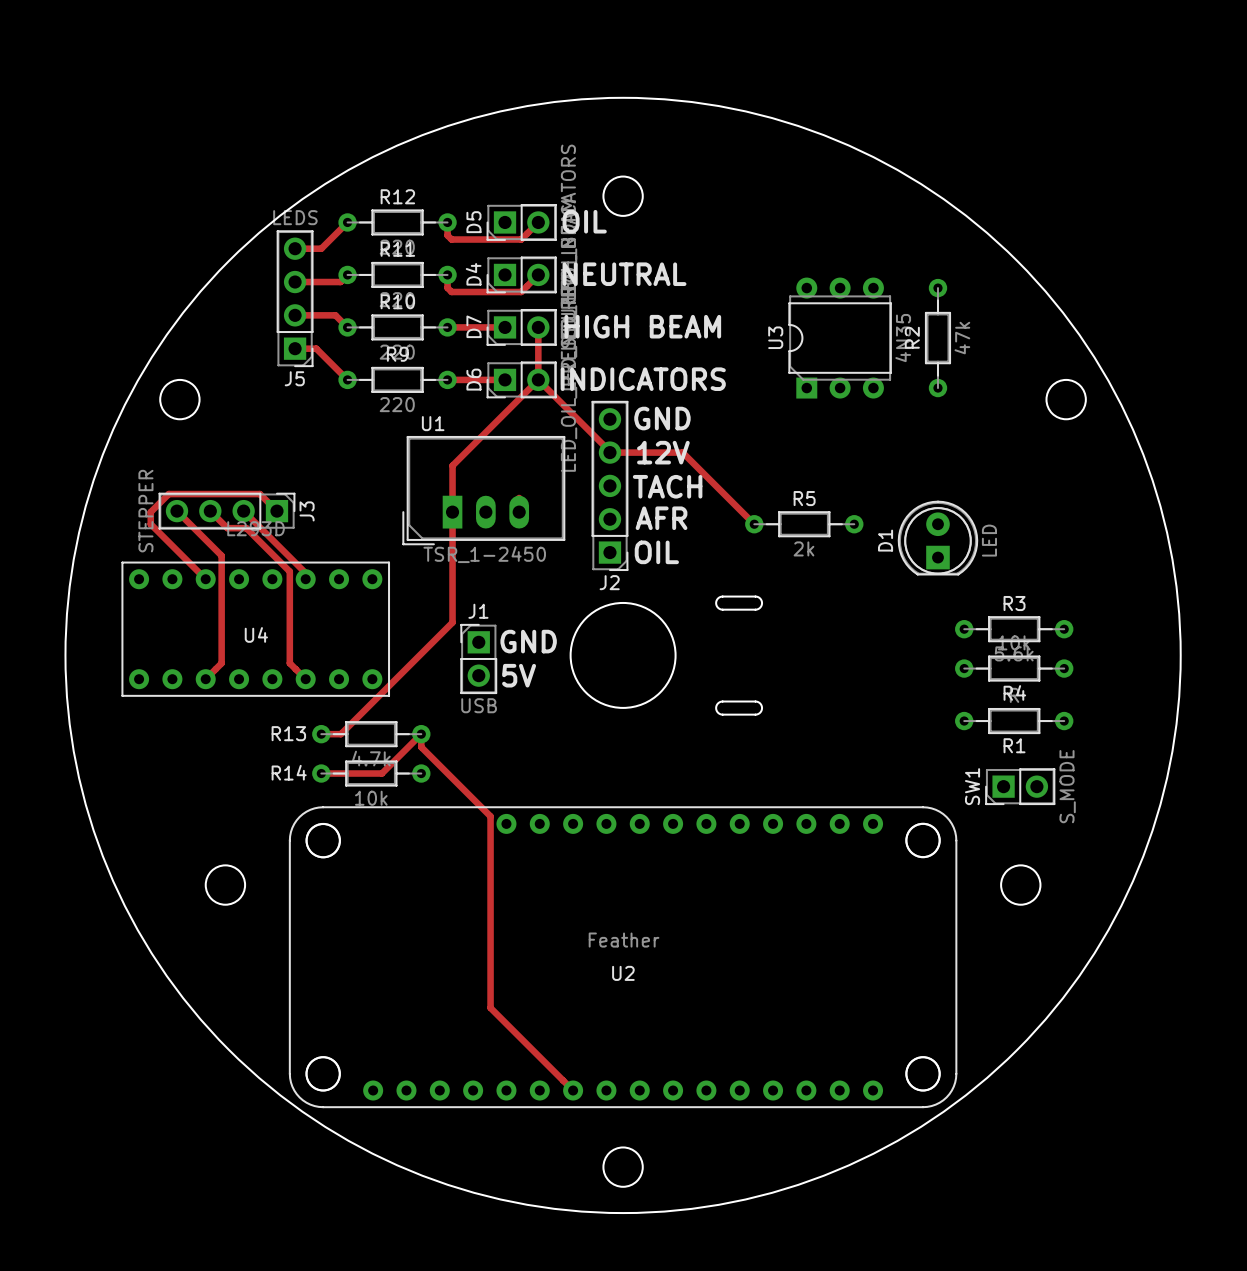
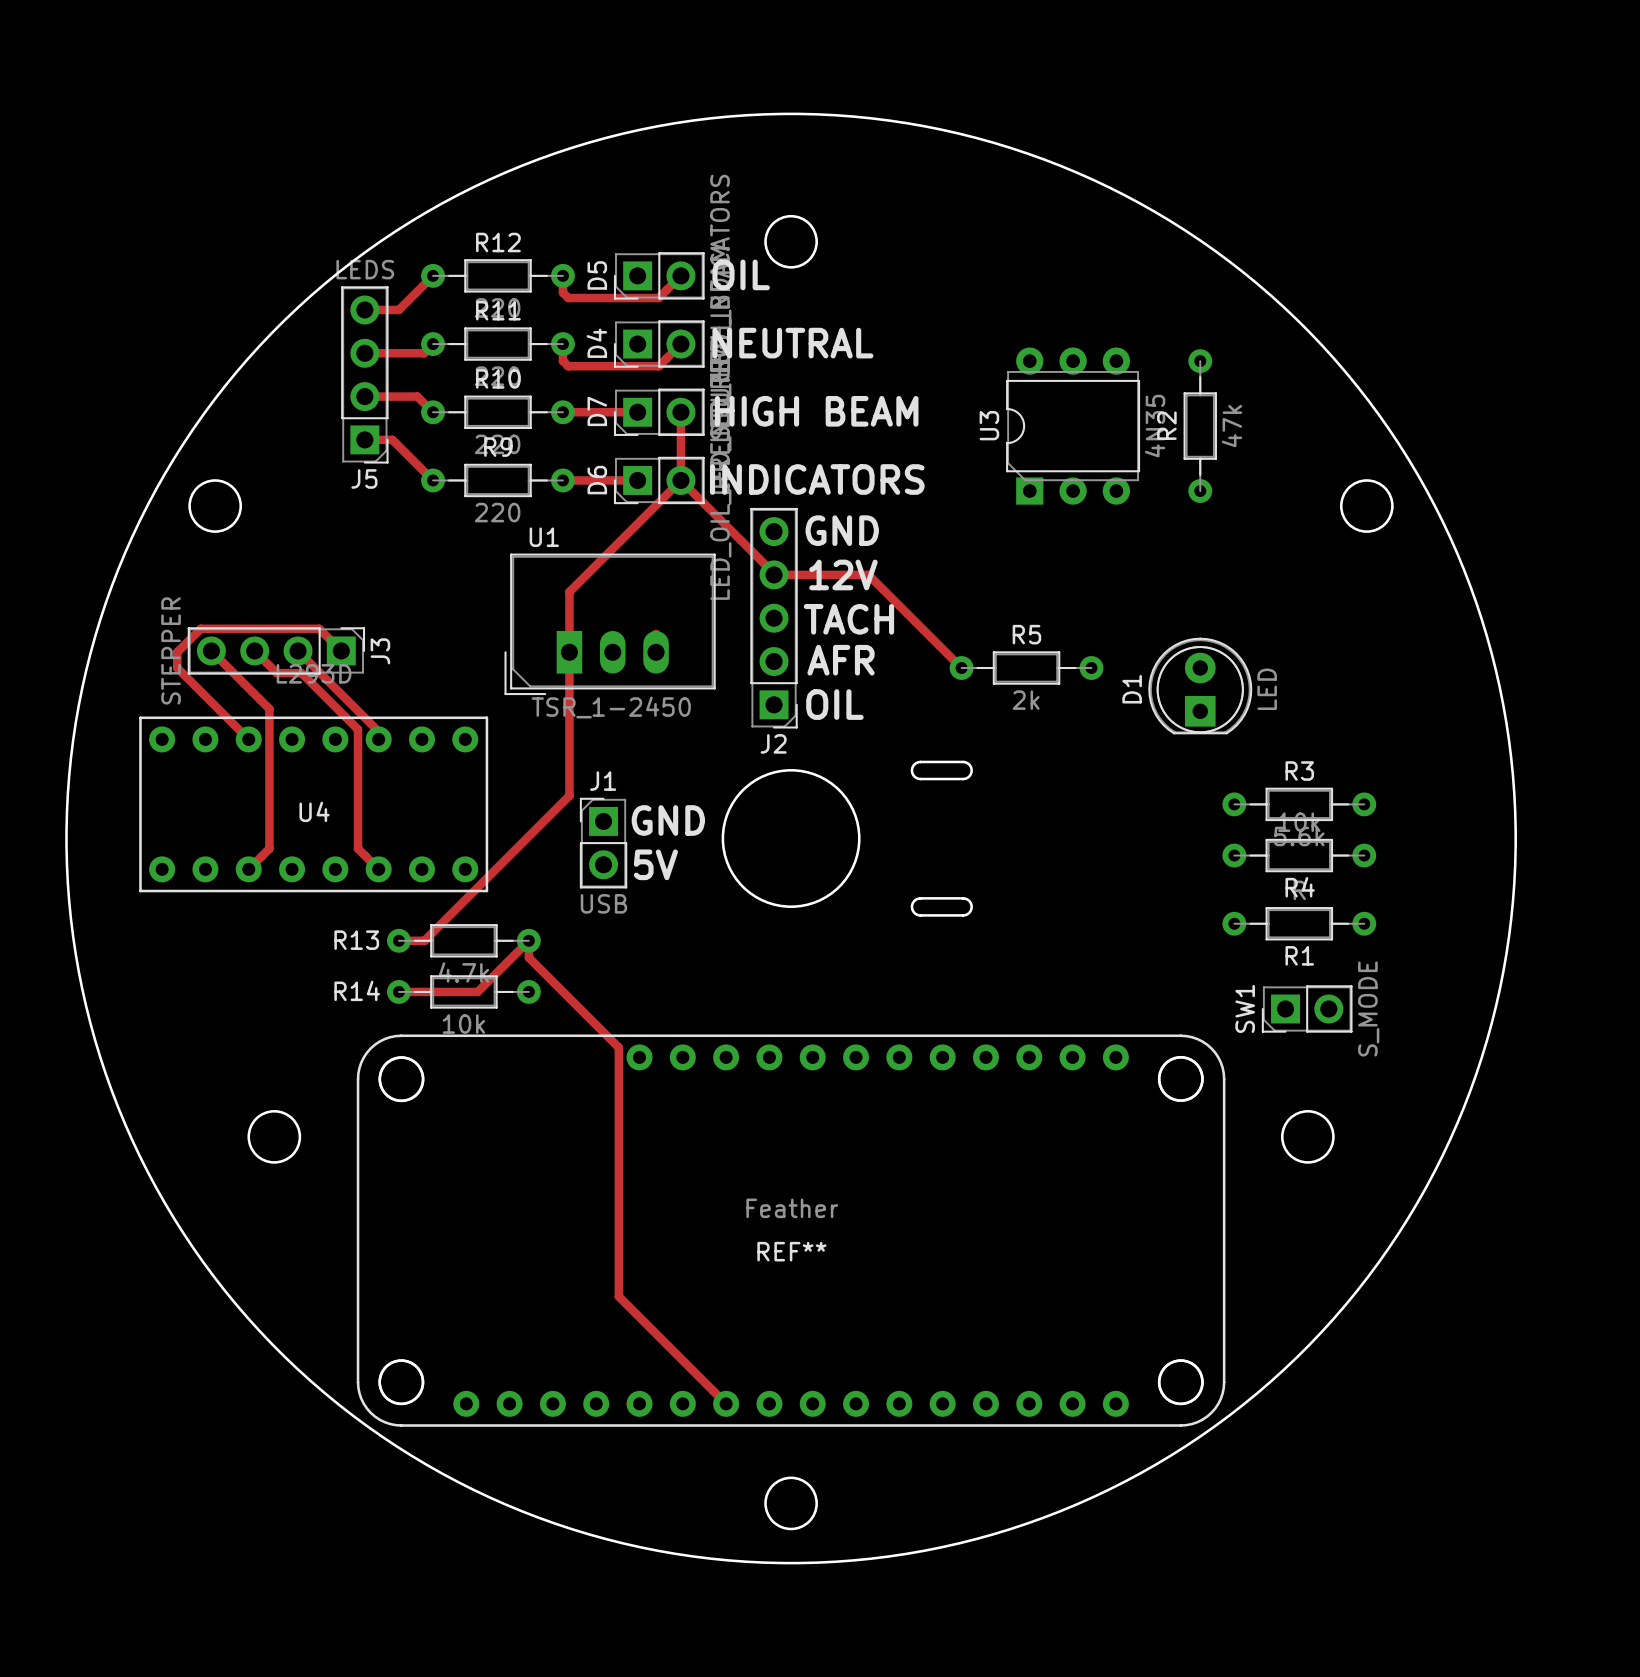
U2 name: U2 (623, 973) -> REF** (791, 1251)

